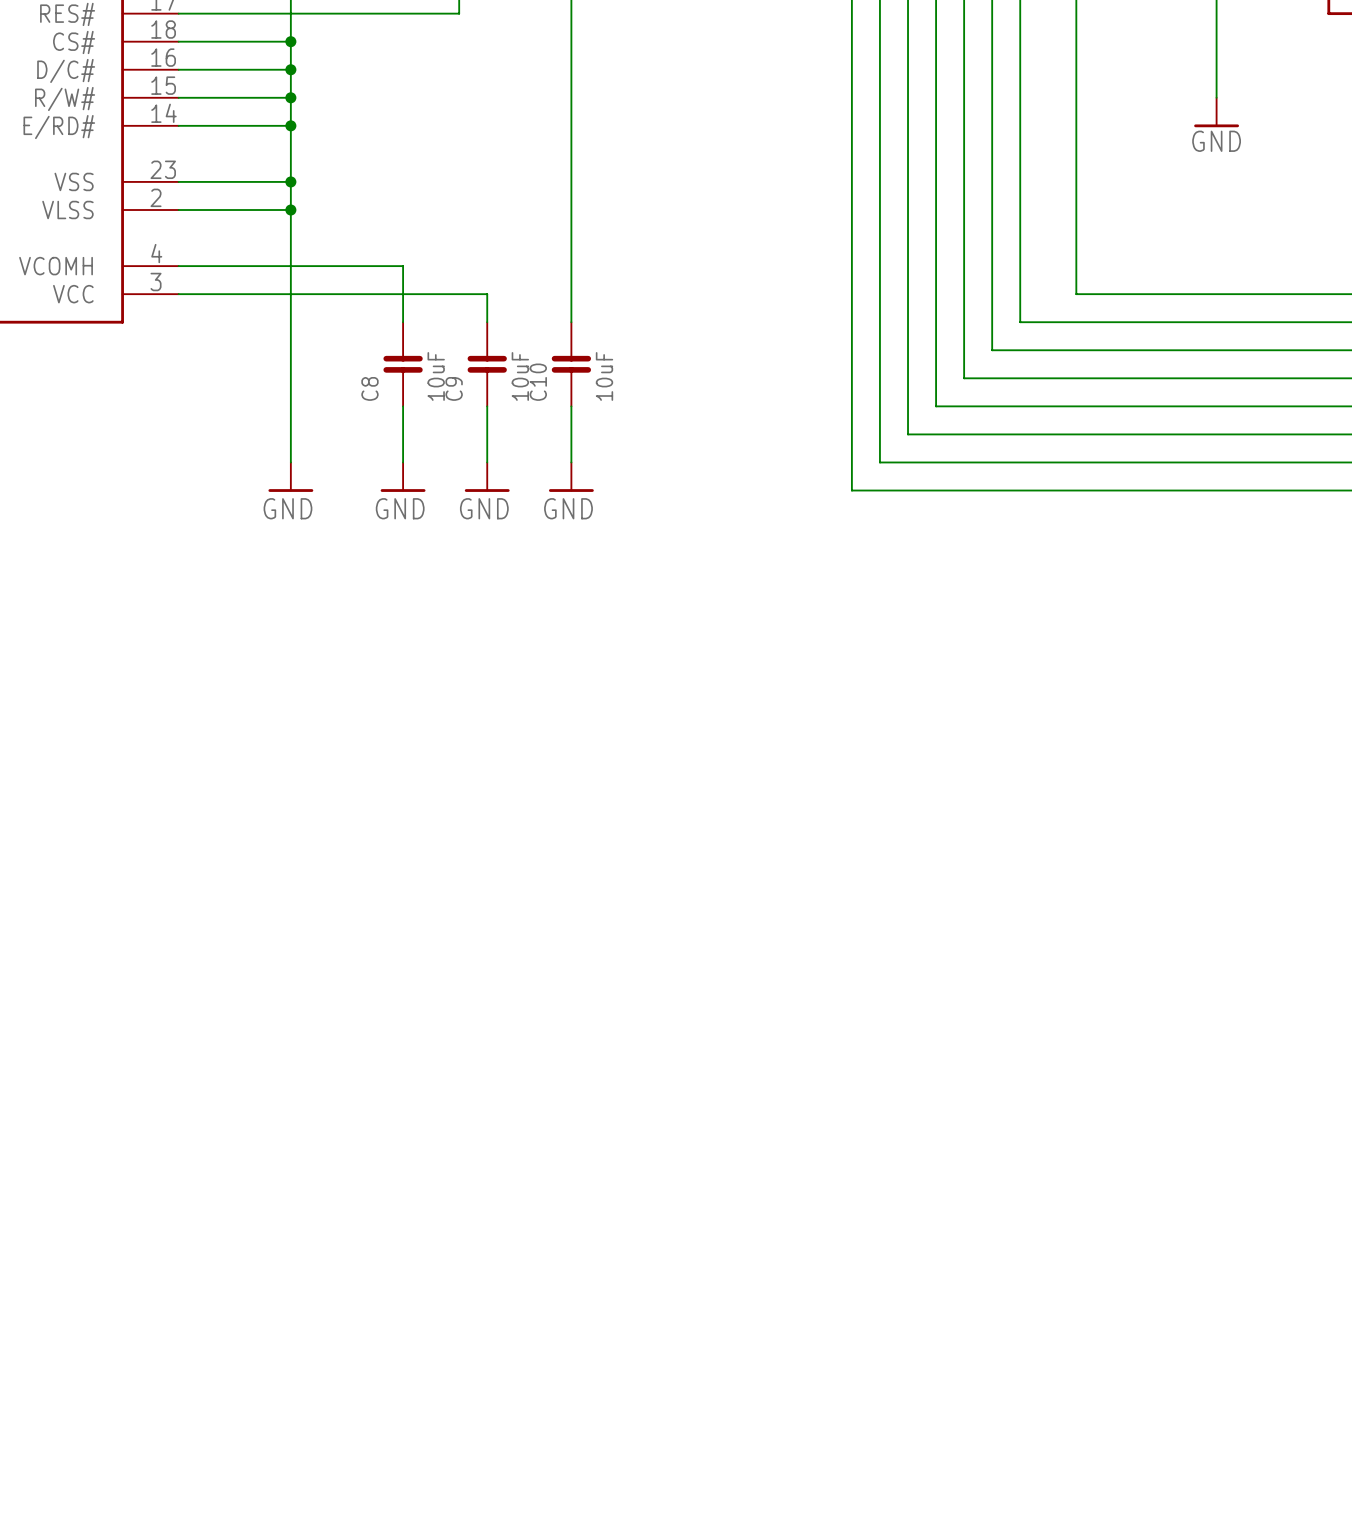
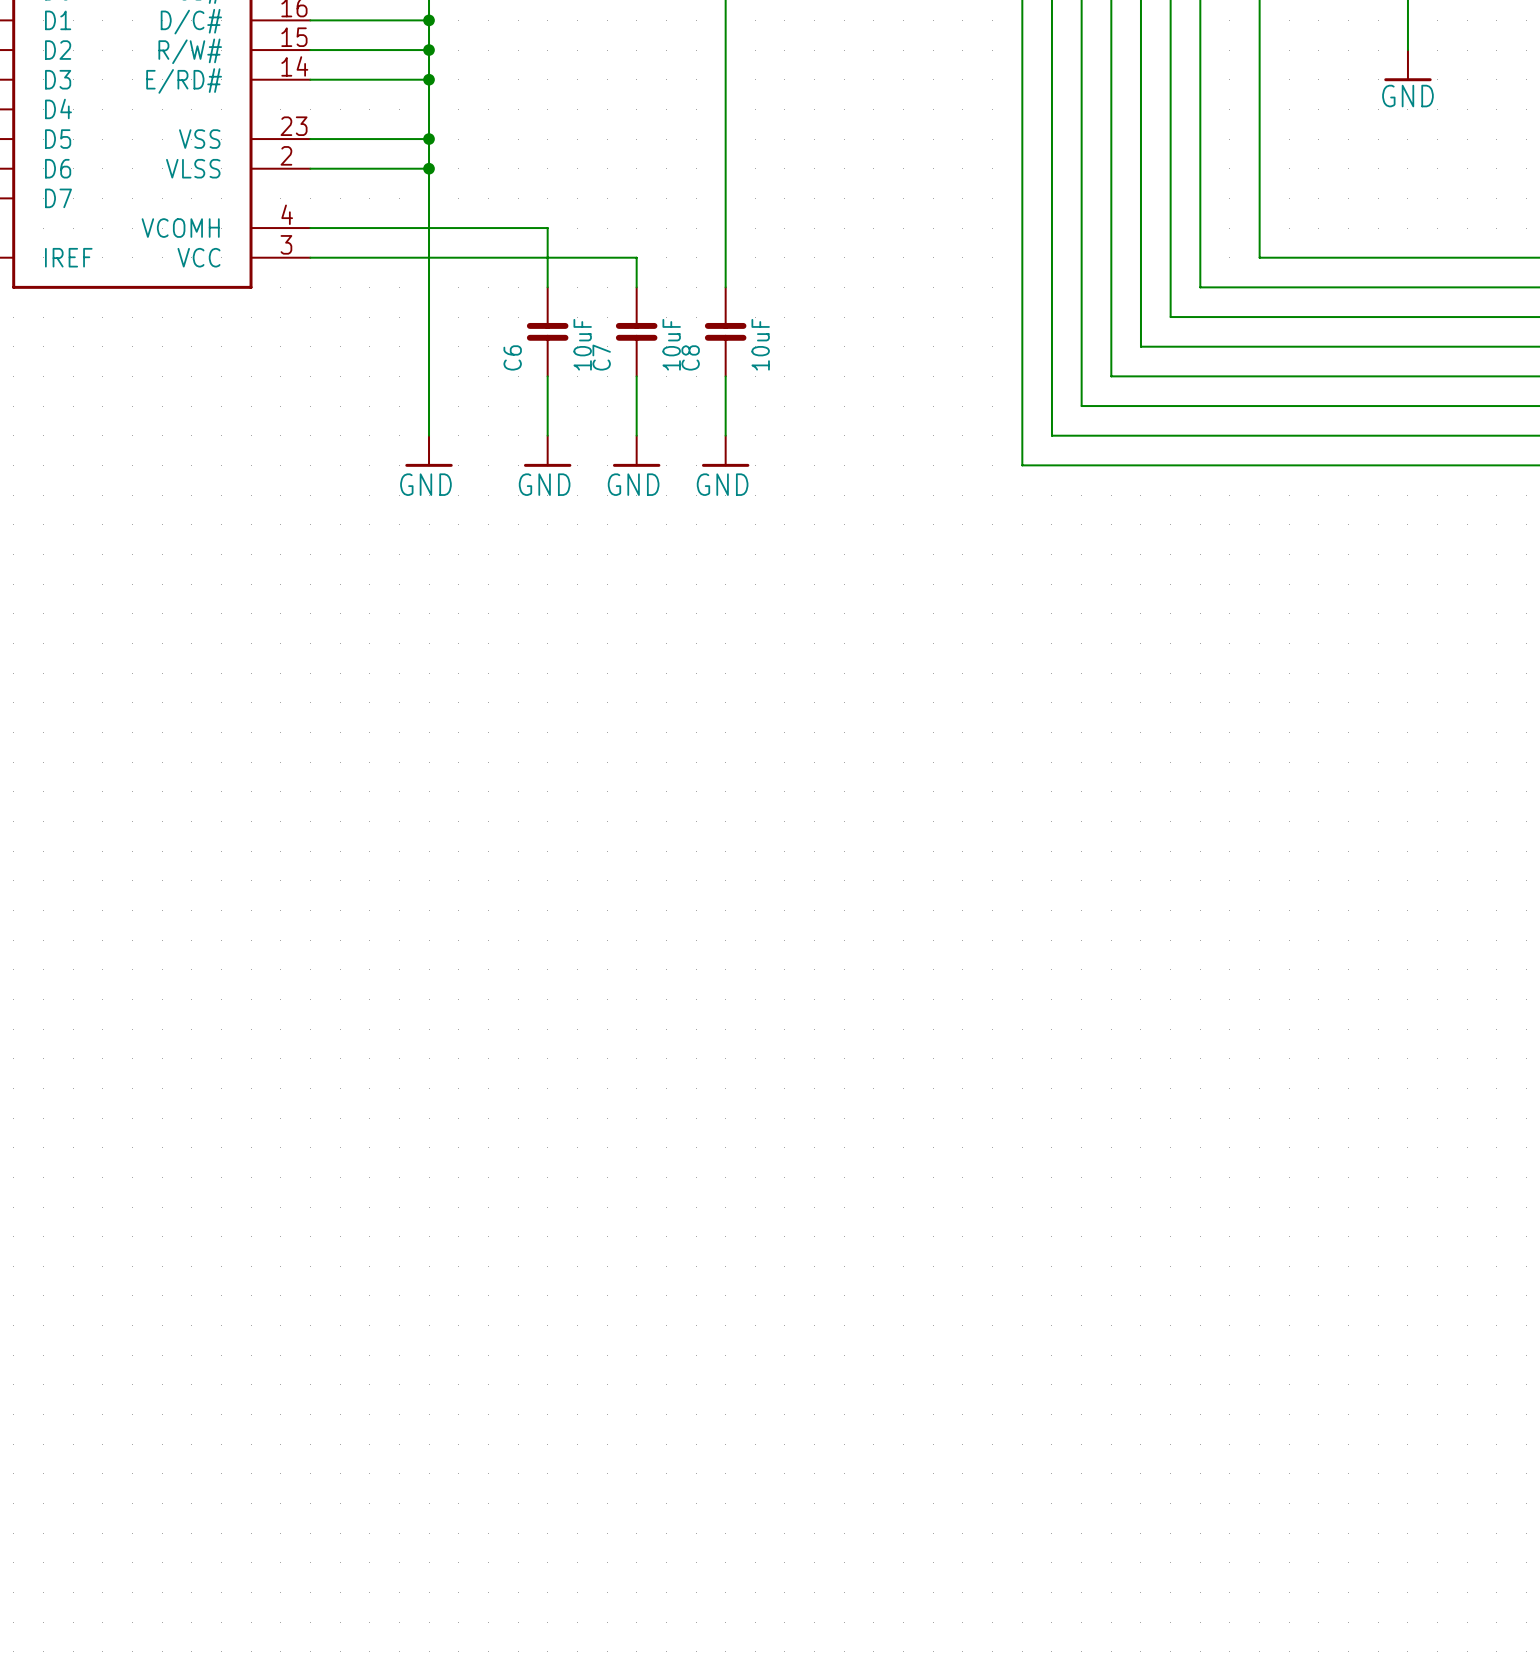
C10 name: C10 (538, 382) -> C8 (690, 357)
C8 name: C8 (369, 388) -> C6 (512, 357)
C9 name: C9 (454, 388) -> C7 (601, 357)

